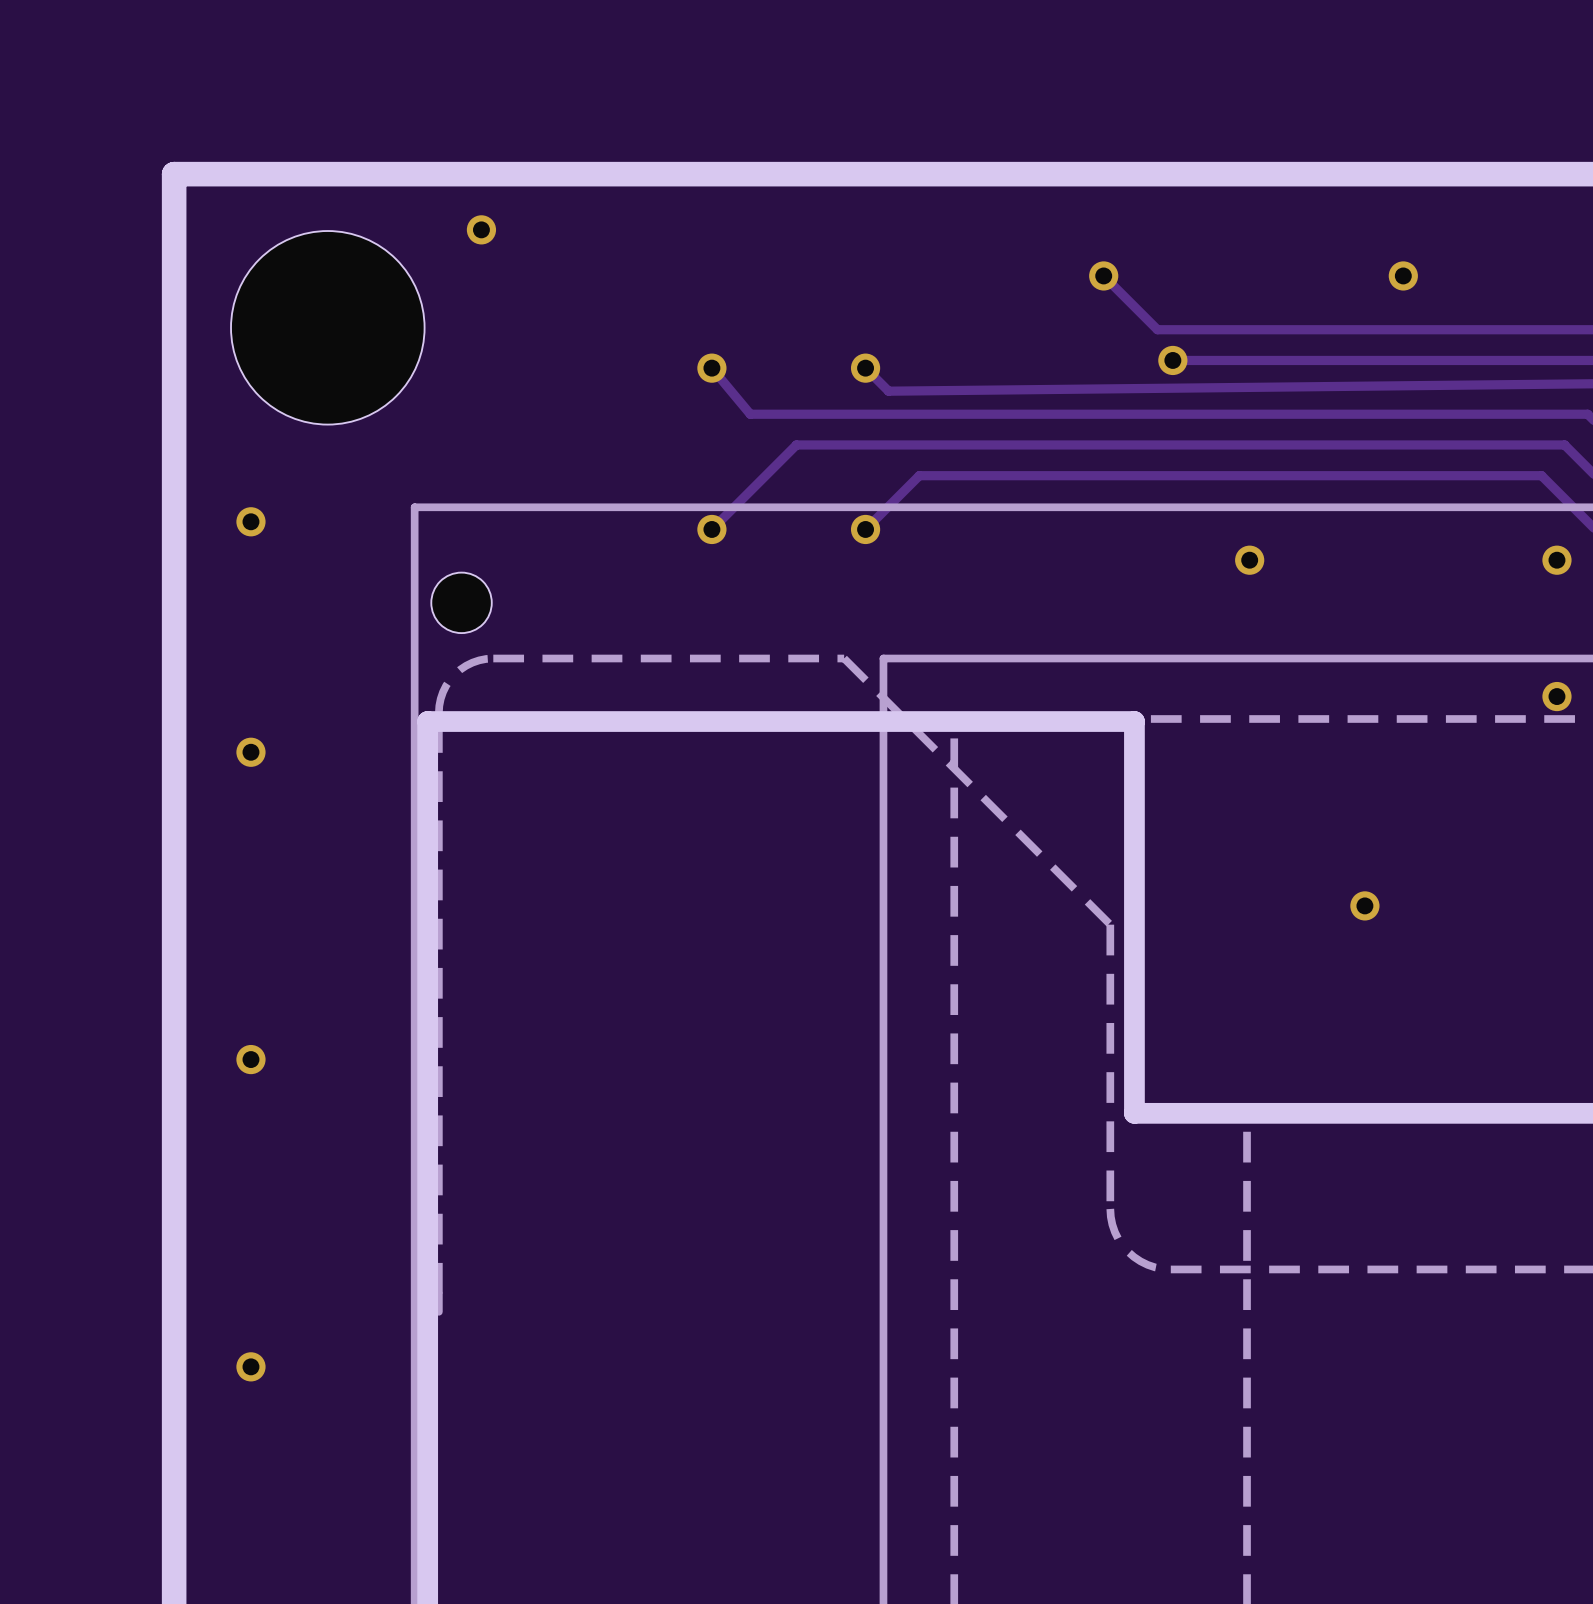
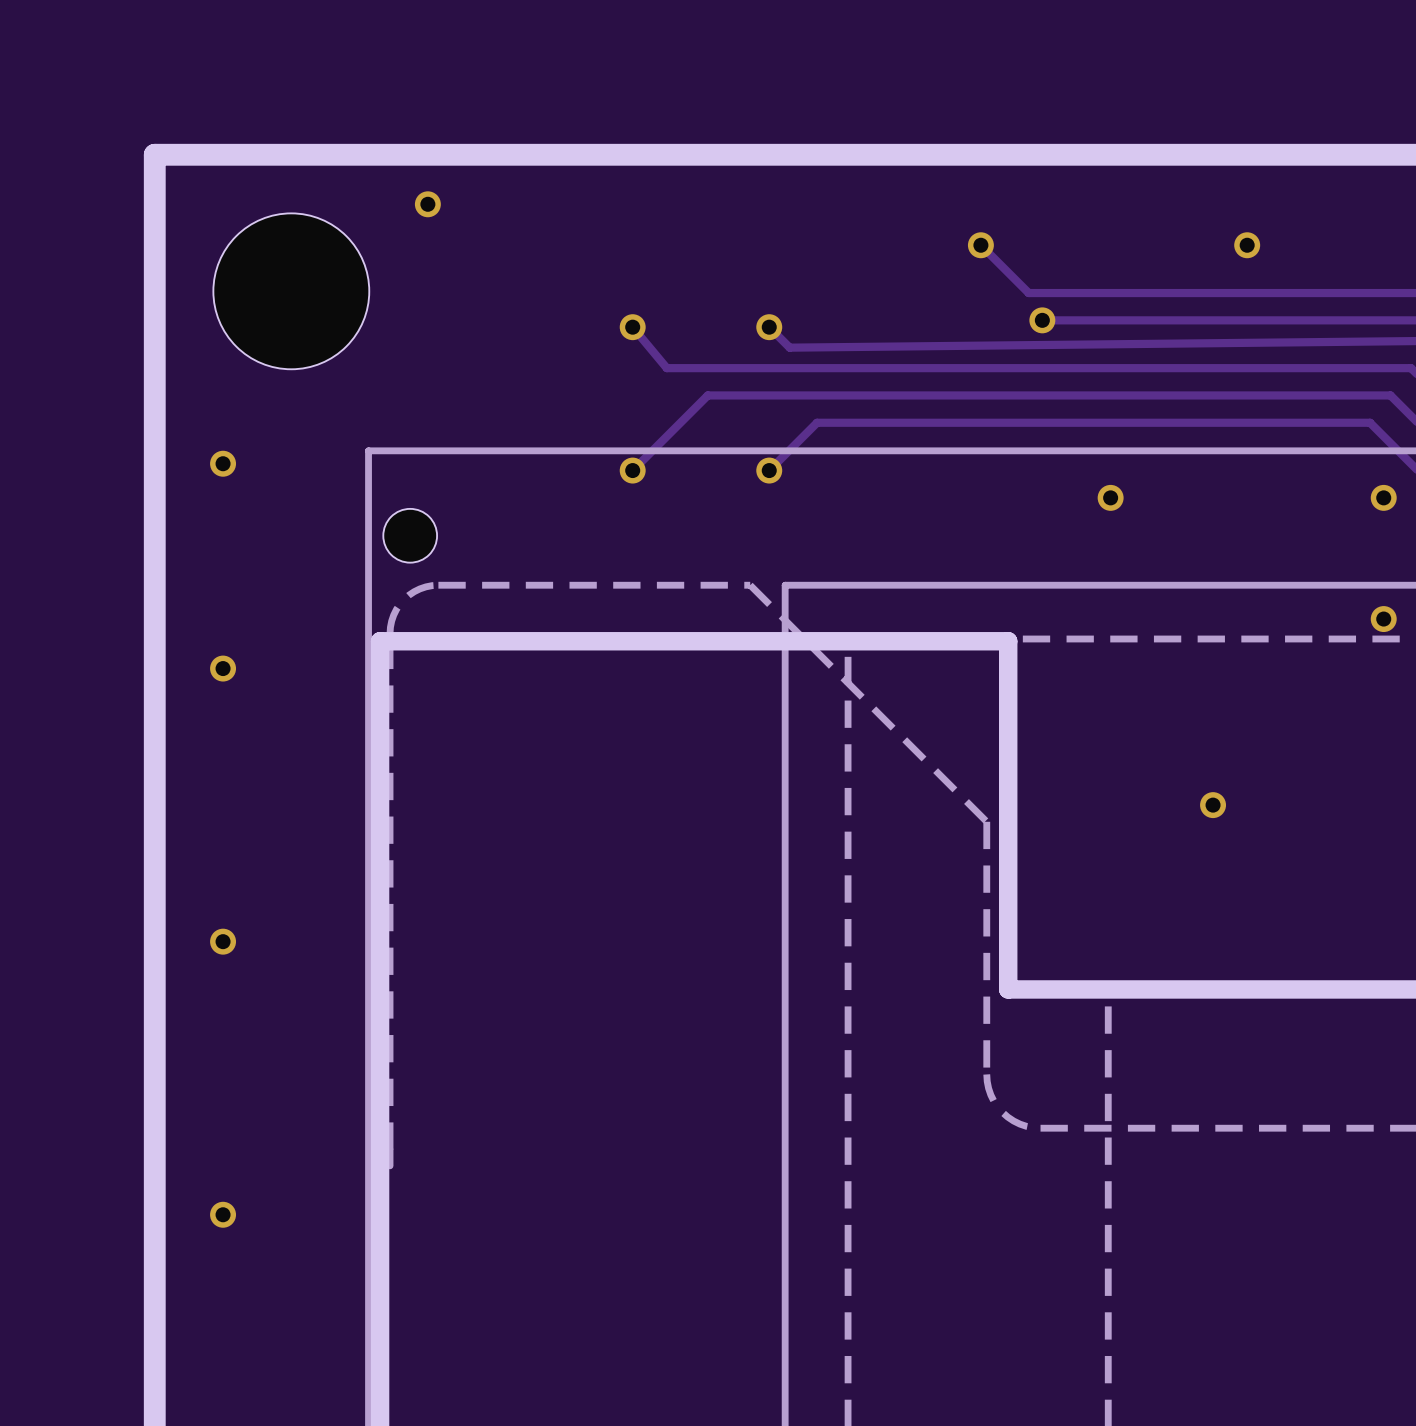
part footprint: [231, 231, 425, 425] -> [213, 213, 370, 370]

